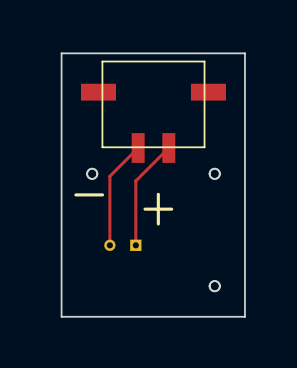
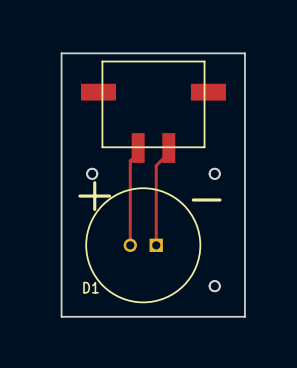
top track: (138, 148) (109, 176) (109, 245) -> none
top track: none -> (143, 148) (130, 160) (130, 245)
top track: (168, 148) (135, 180) (135, 245) -> none
top track: none -> (173, 148) (156, 165) (156, 245)
text position: _ (89, 194) -> _ (206, 200)
text rotation: 0° (158, 209) -> 90° counterclockwise (94, 196)
part: (122, 245) -> none
D1: none -> (143, 245)

